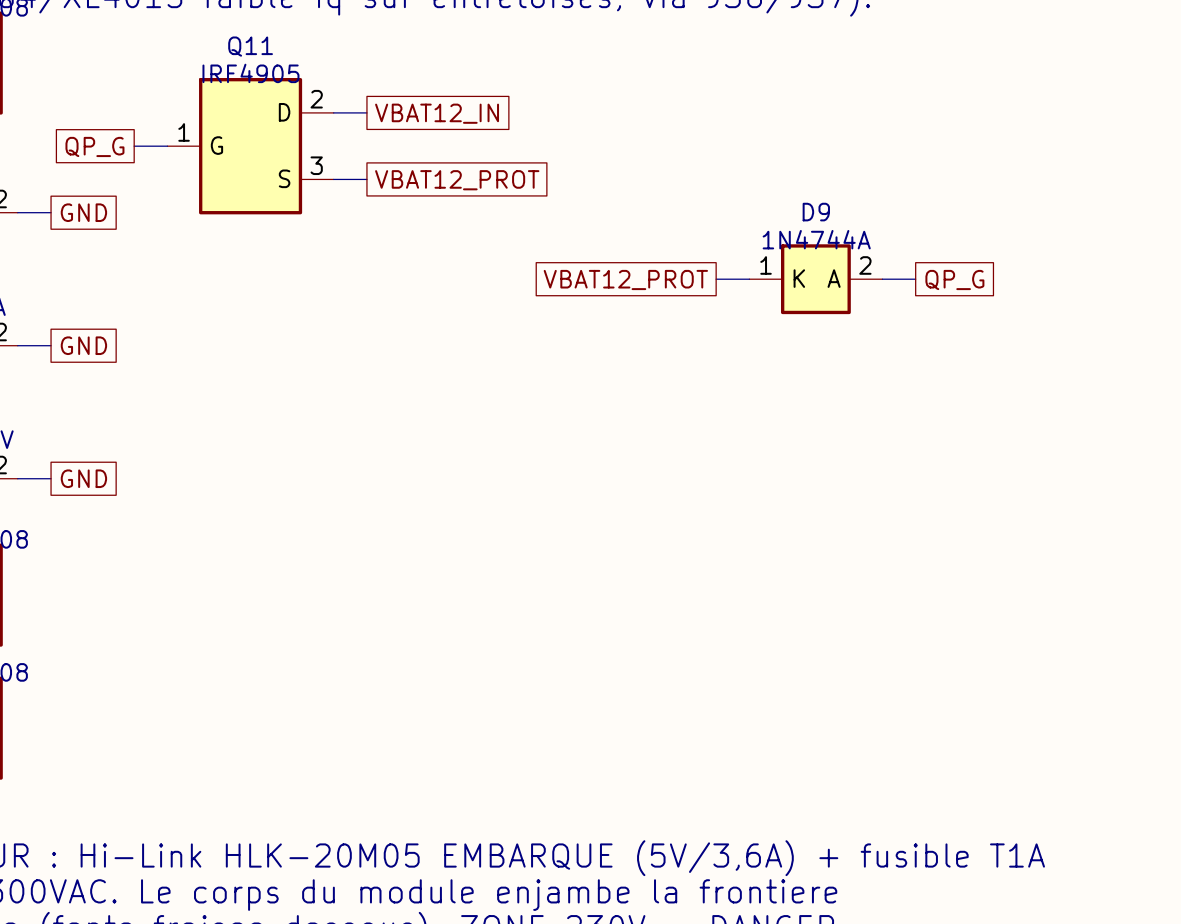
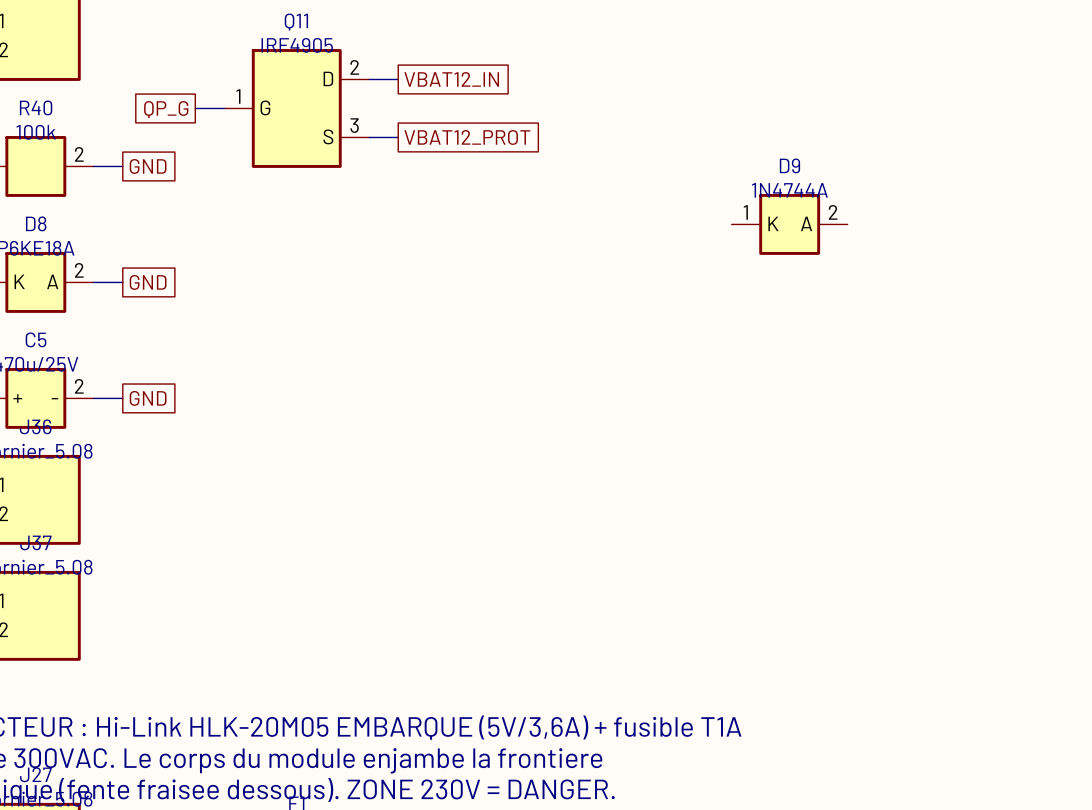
global label: VBAT12_PROT (625, 279) -> none
wire: (716, 279) (749, 279) -> none
wire: (882, 279) (915, 279) -> none
global label: QP_G (954, 279) -> none

